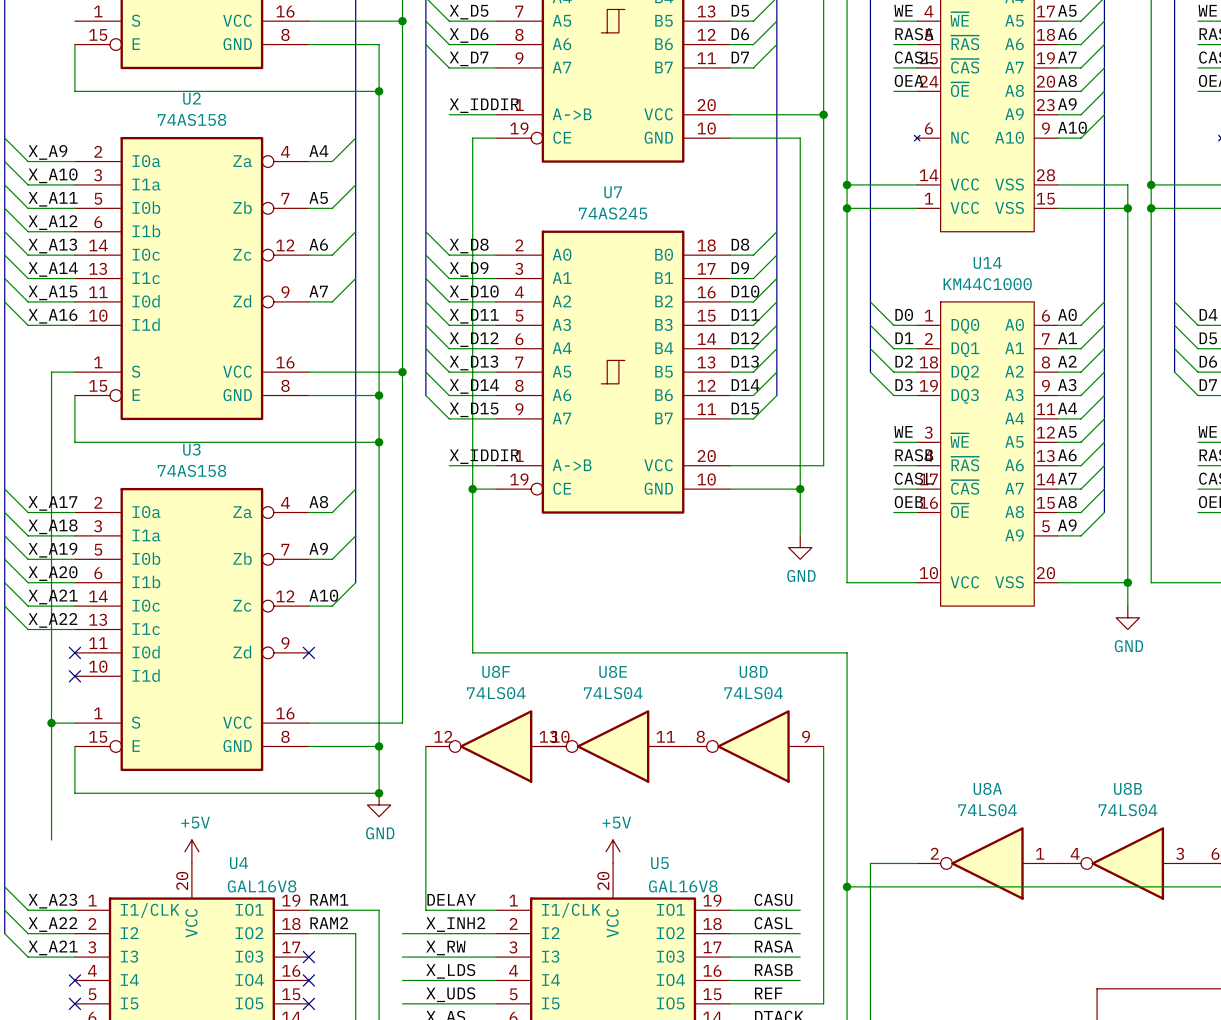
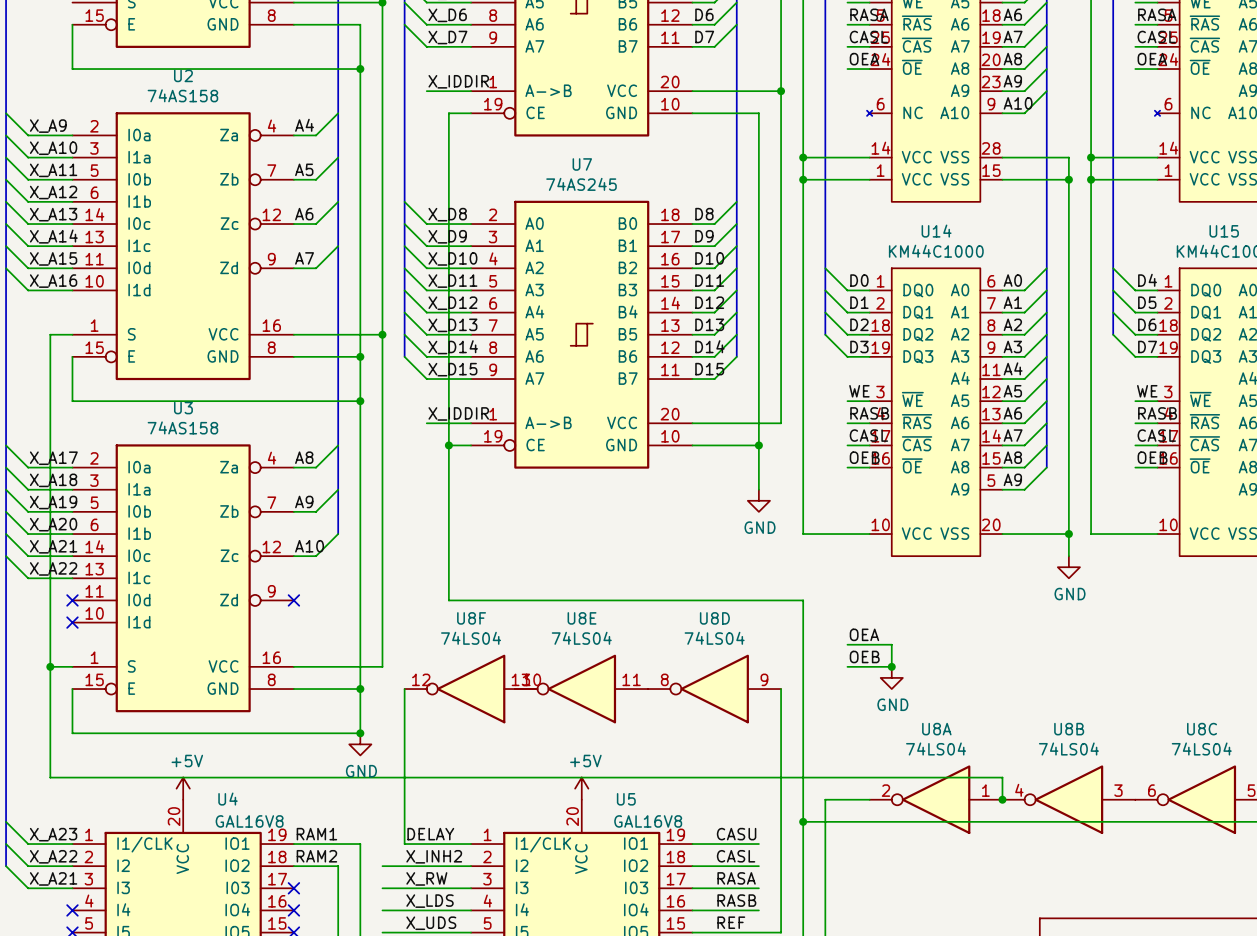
label: none -> OEA (864, 634)
wire: none -> (847, 644) (891, 644) (891, 666) (847, 666)
label: none -> OEB (864, 656)
junction: none -> (891, 666)
power symbol: none -> GND (891, 677)
wire: none -> (50, 777) (1002, 777) (1002, 799)
junction: none -> (1002, 799)

